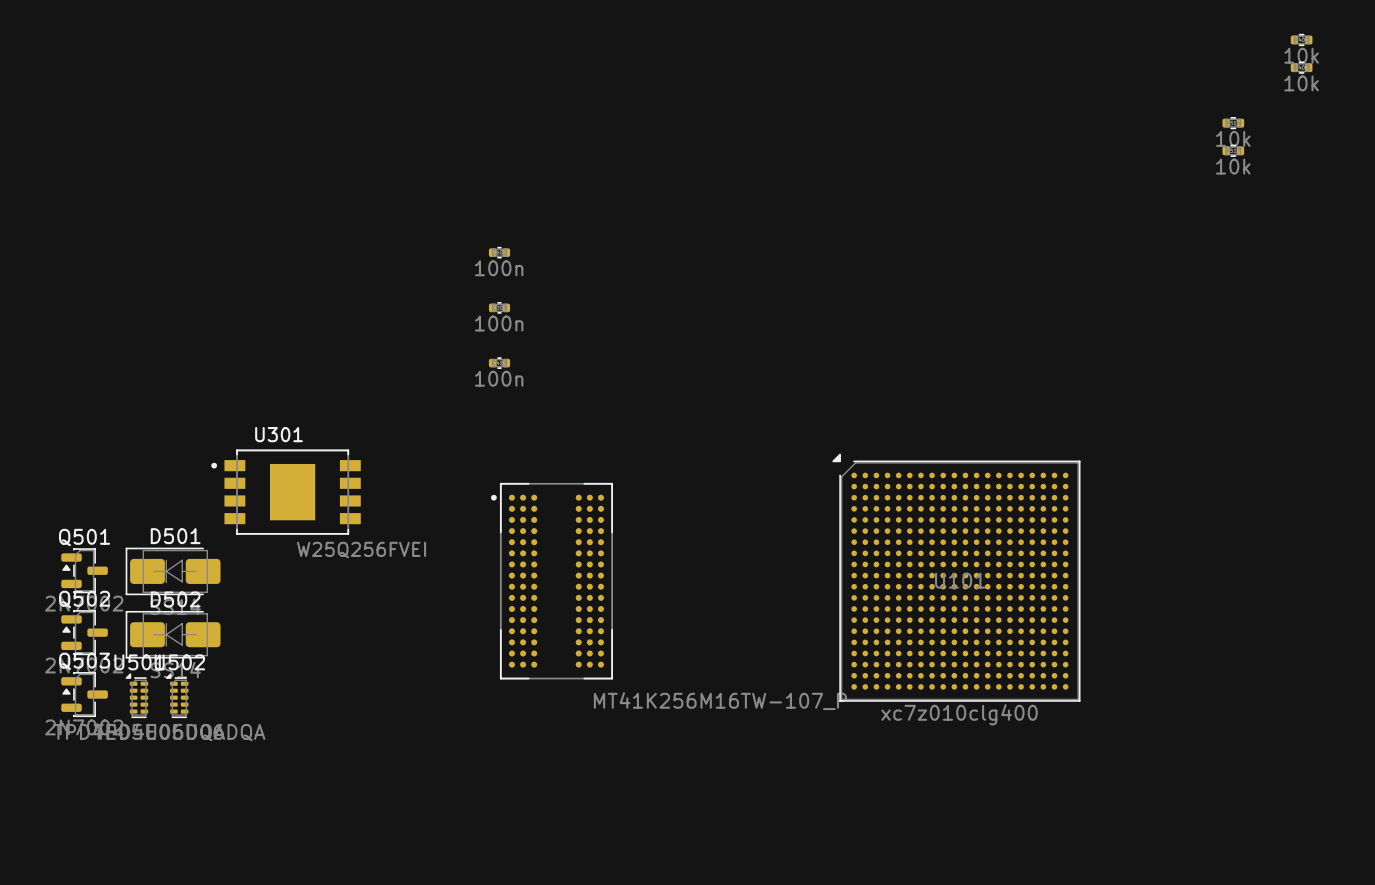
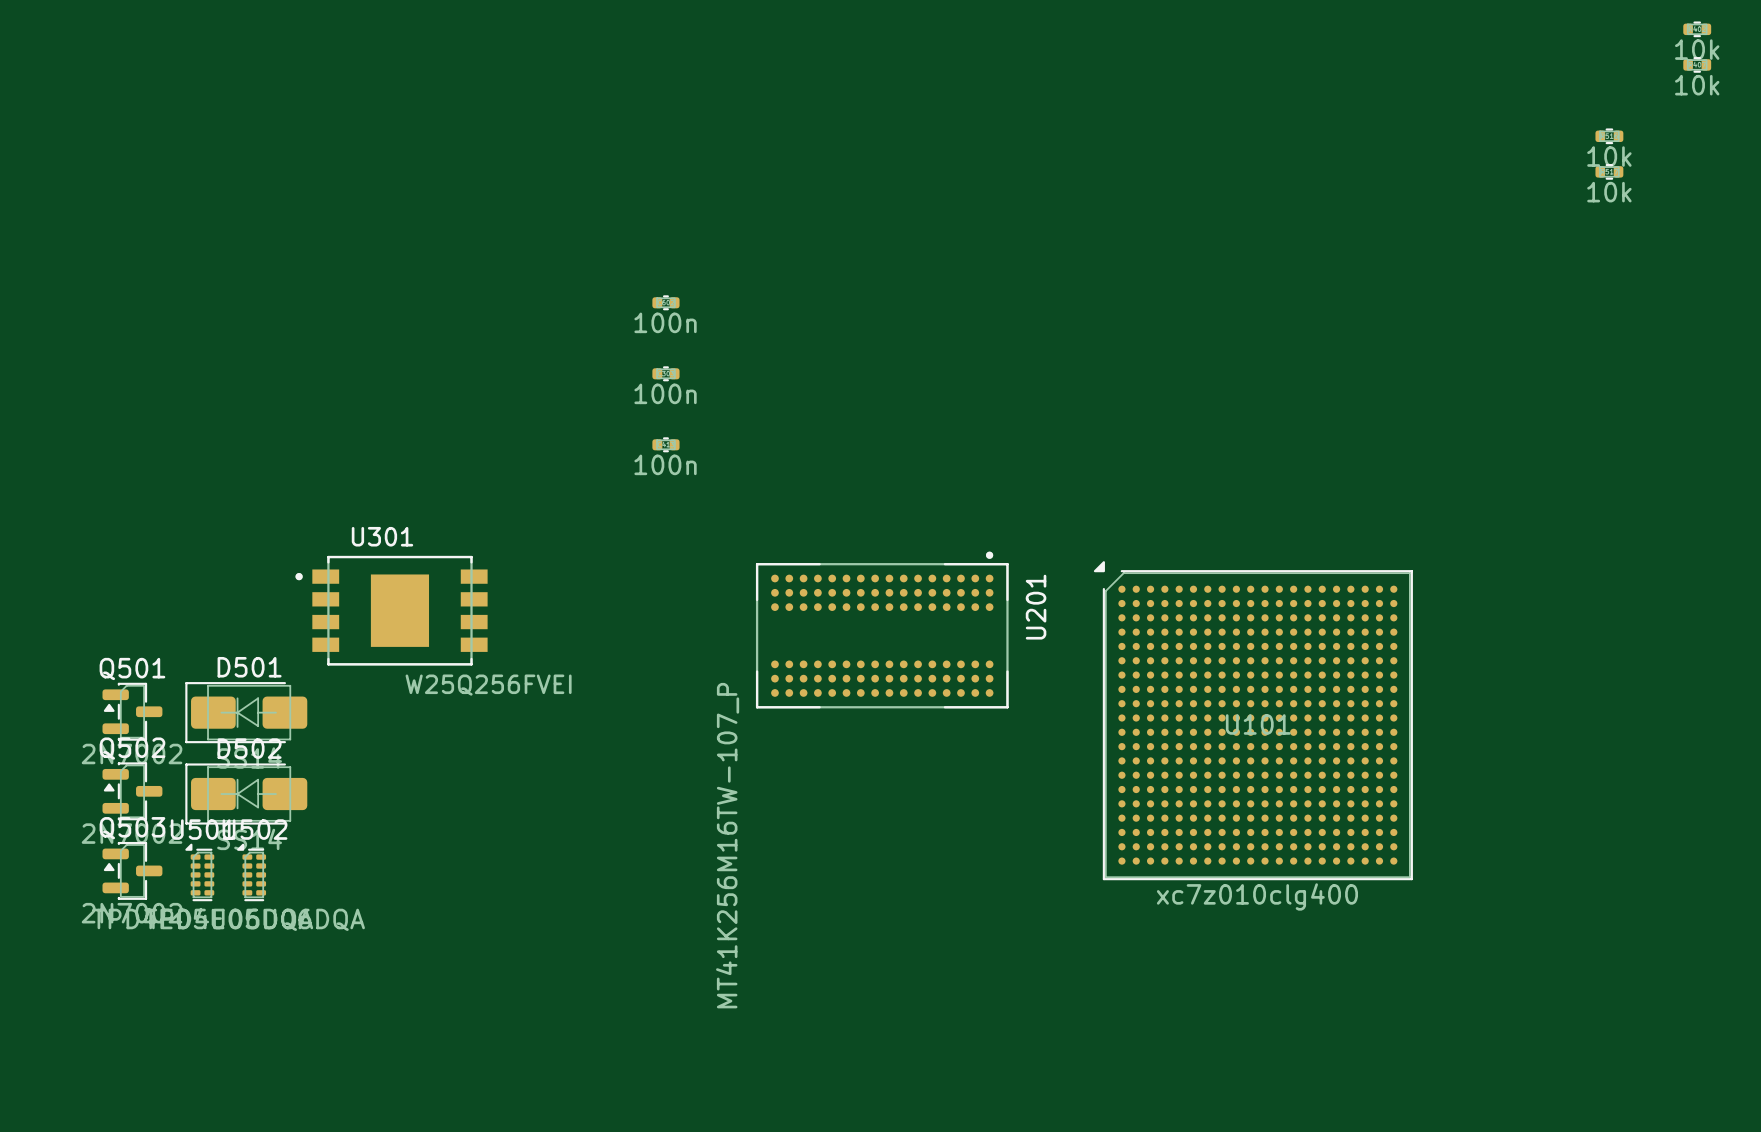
U201: none -> MT41K256M16TW-107_P (882, 630)
part: MT41K256M16TW-107_P (552, 581) -> none

